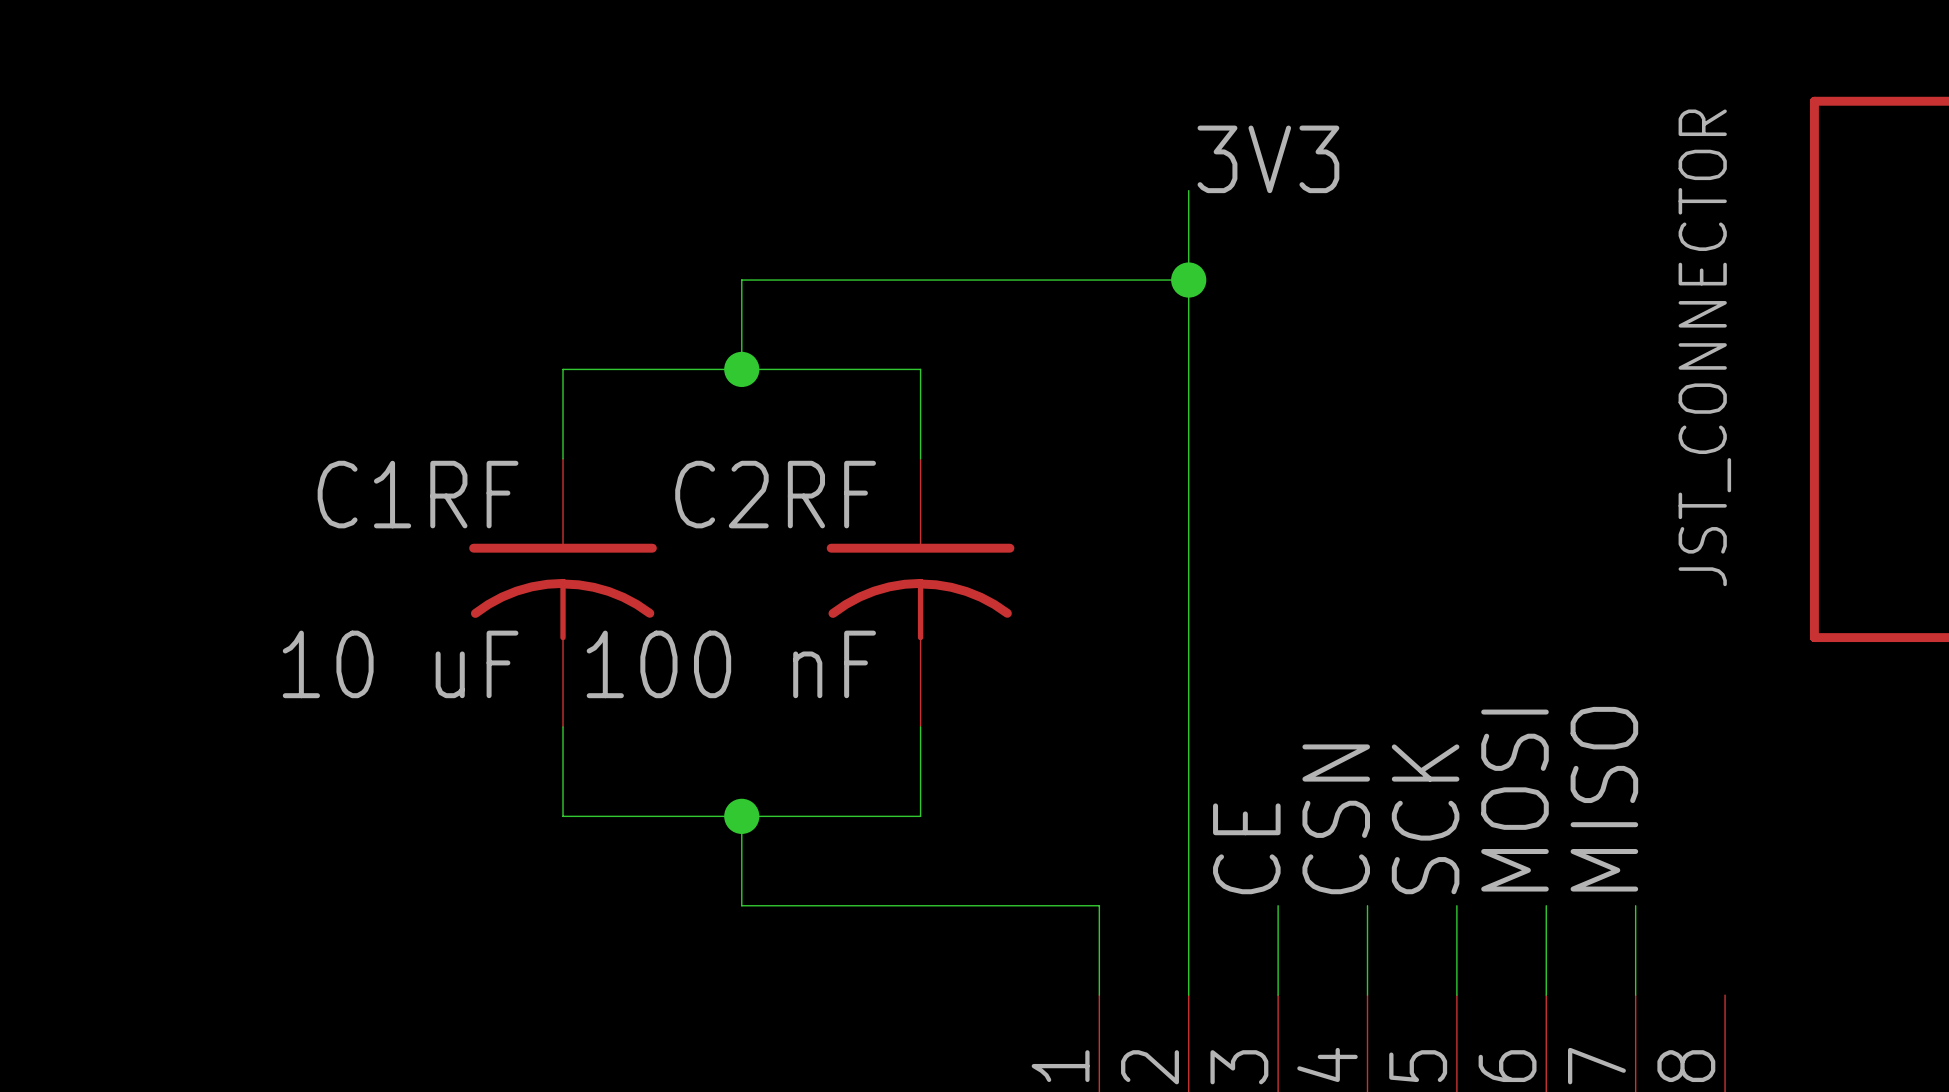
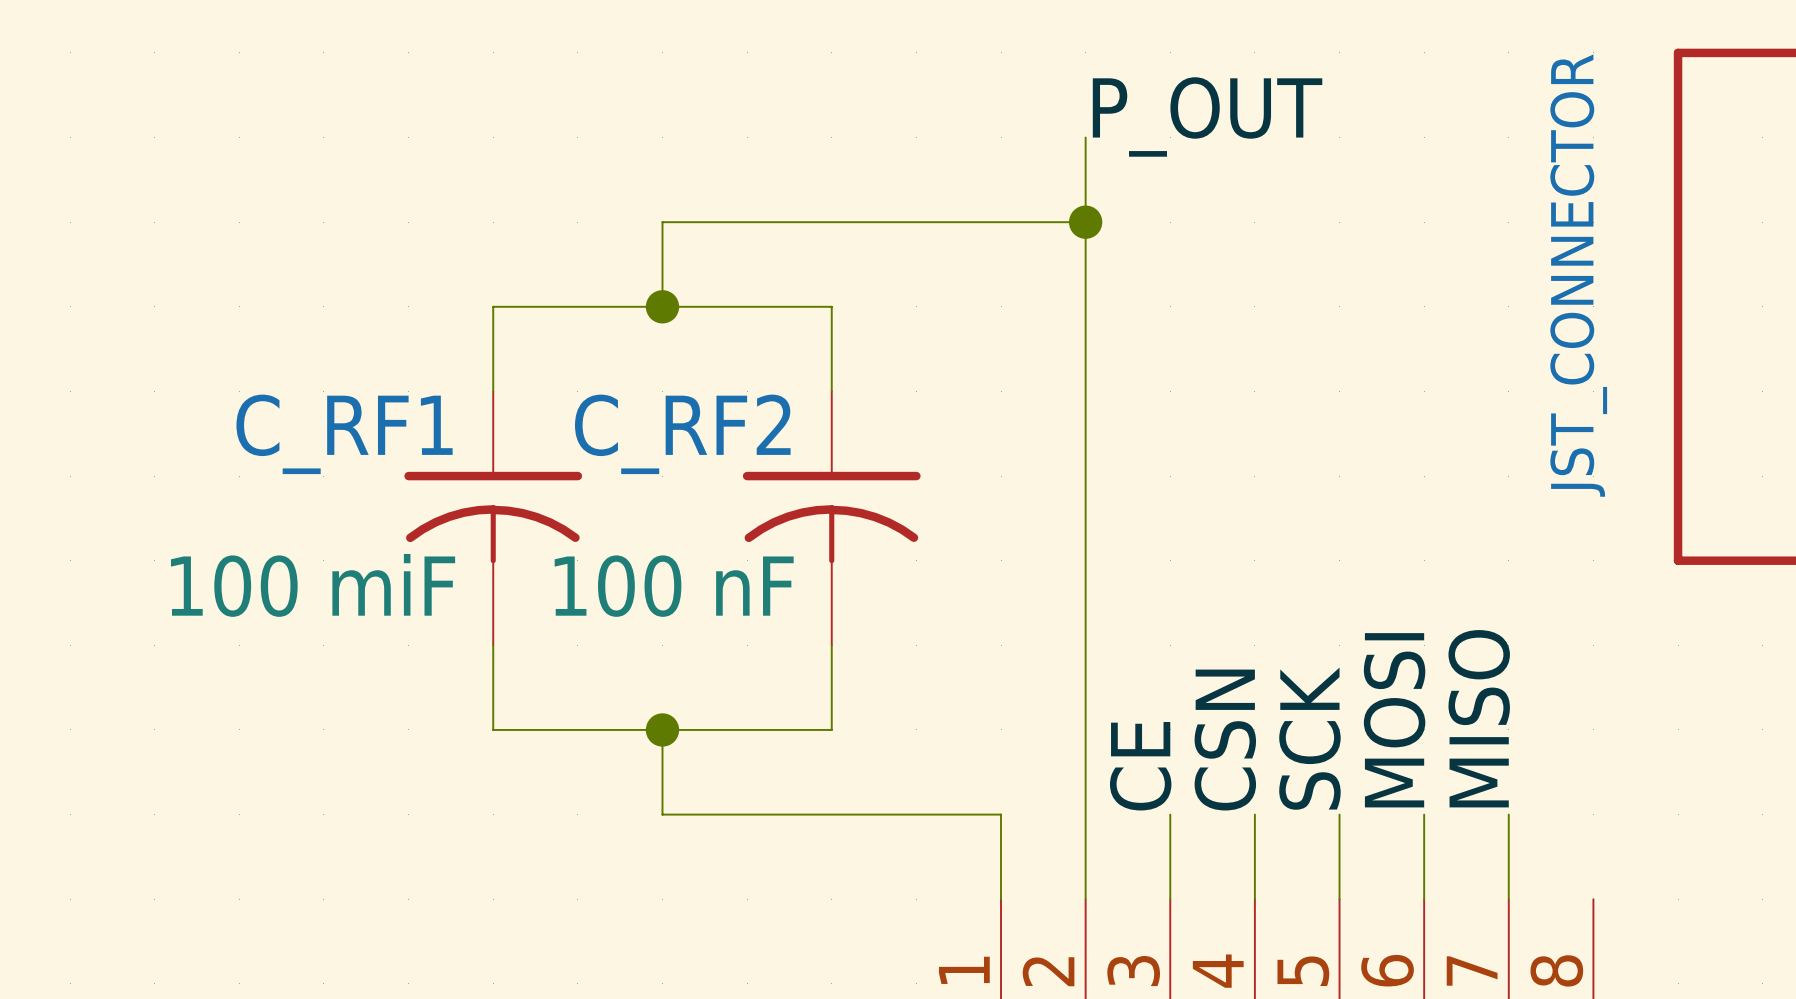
label: 3V3 (1268, 159) -> P_OUT (1207, 116)
C1RF name: C1RF (418, 494) -> C_RF1 (344, 434)
C2RF name: C2RF (775, 494) -> C_RF2 (682, 434)
C1RF value: 10 uF (400, 664) -> 100 miF (313, 585)

